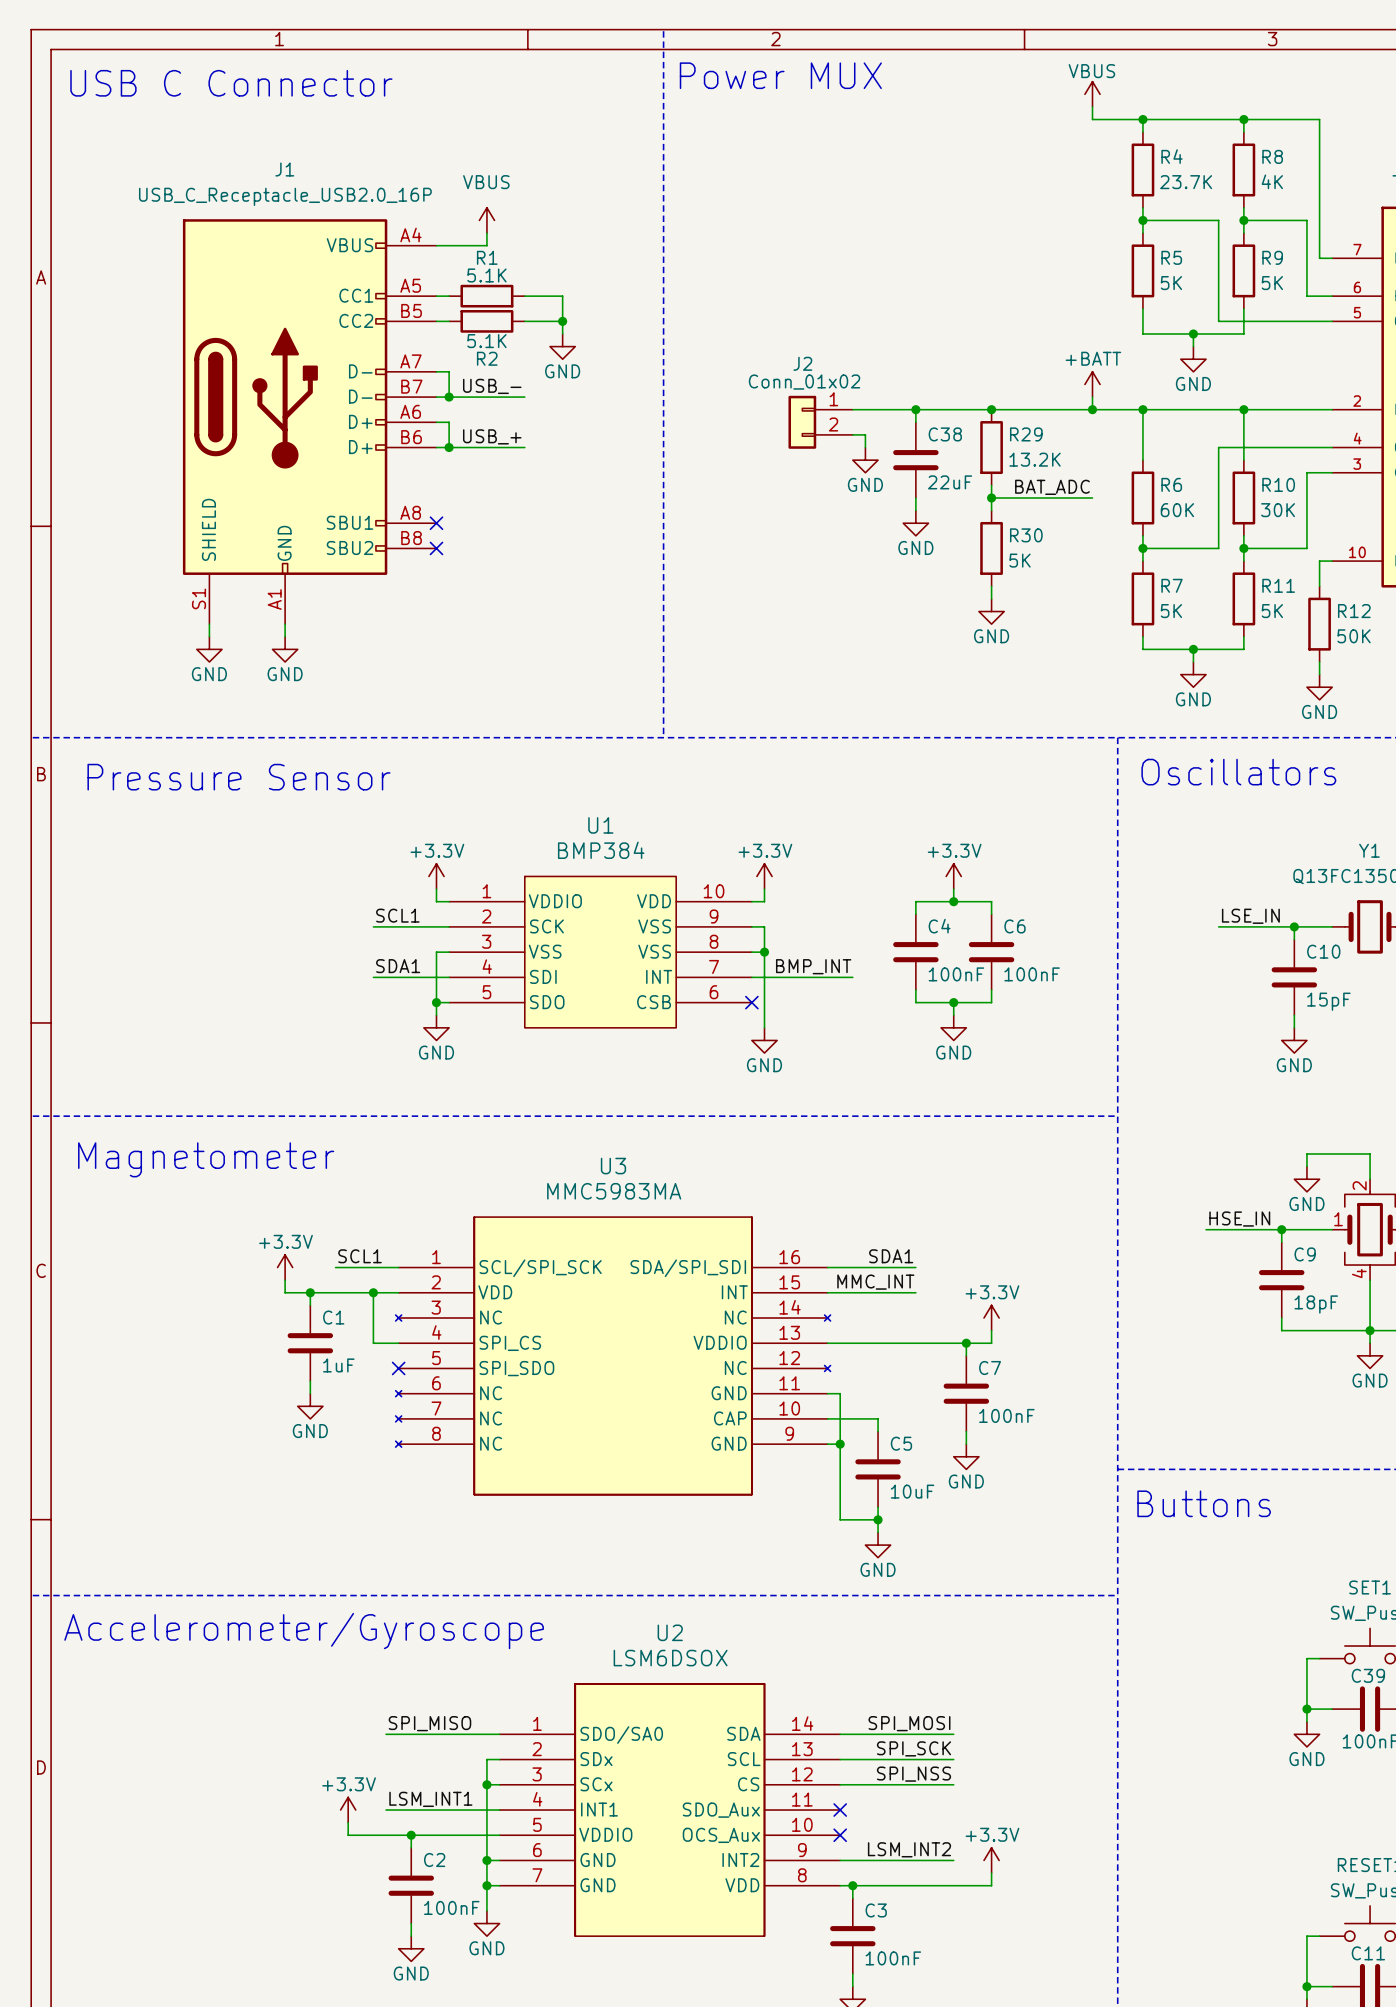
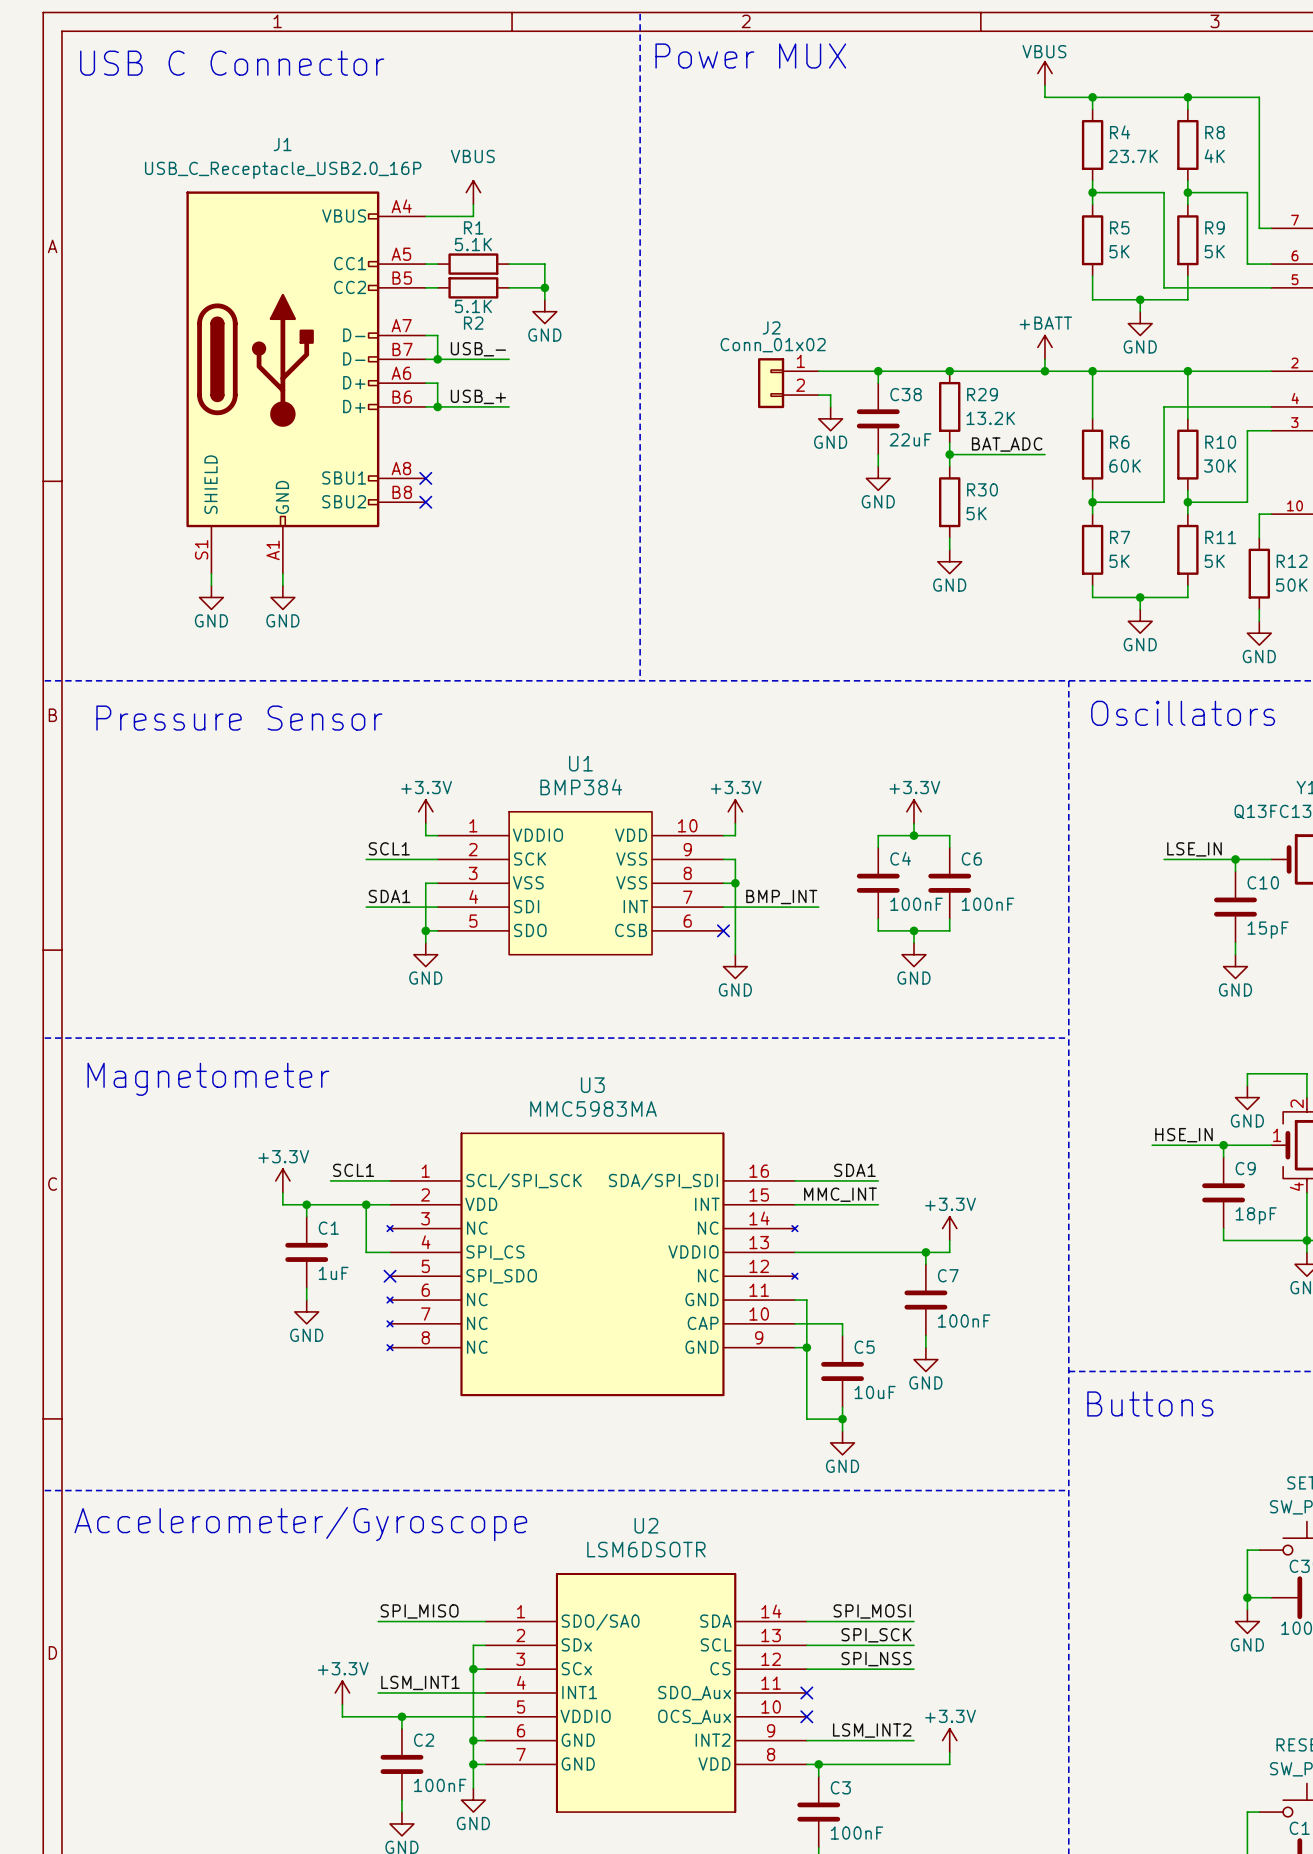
U2 value: LSM6DSOX (670, 1658) -> LSM6DSOTR (646, 1549)

